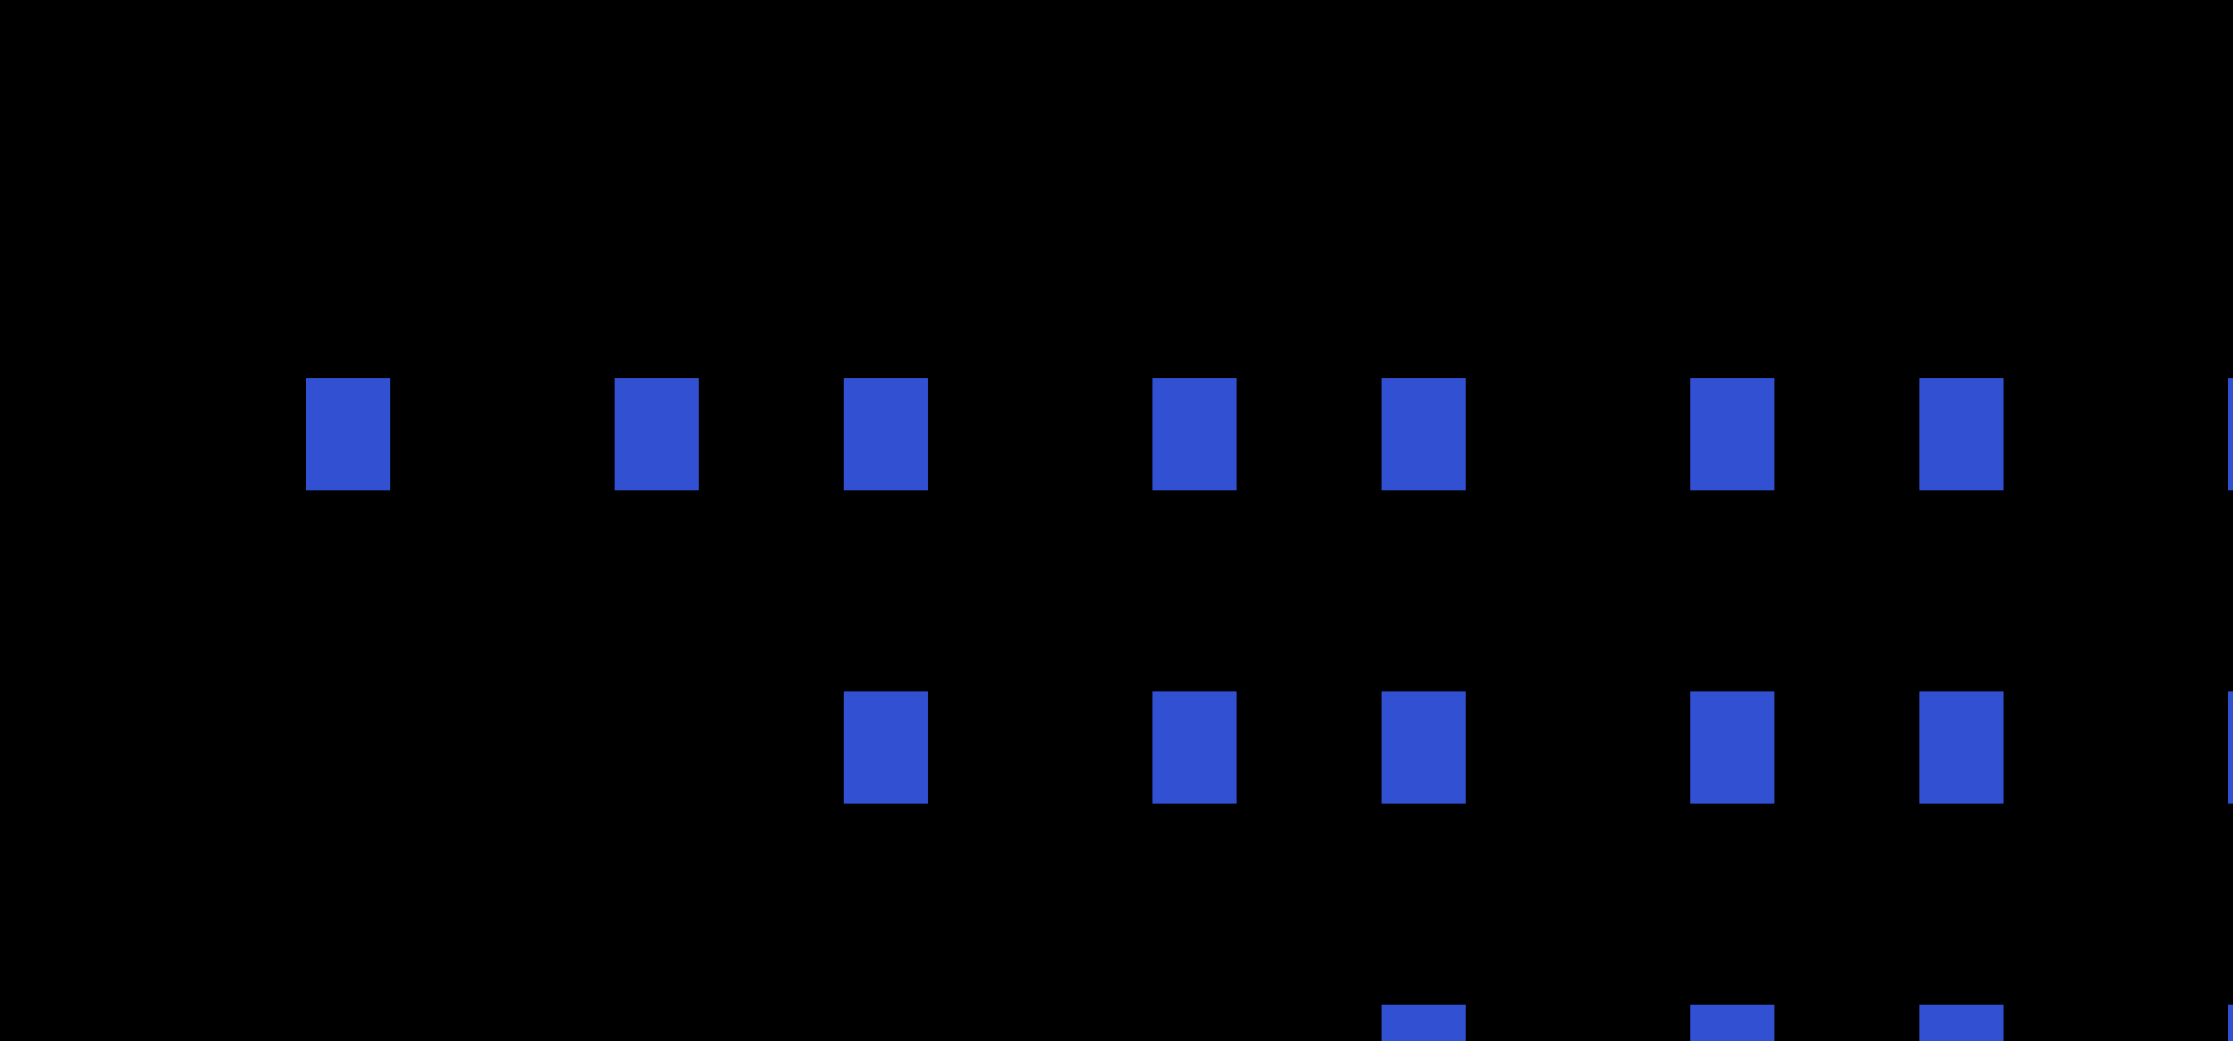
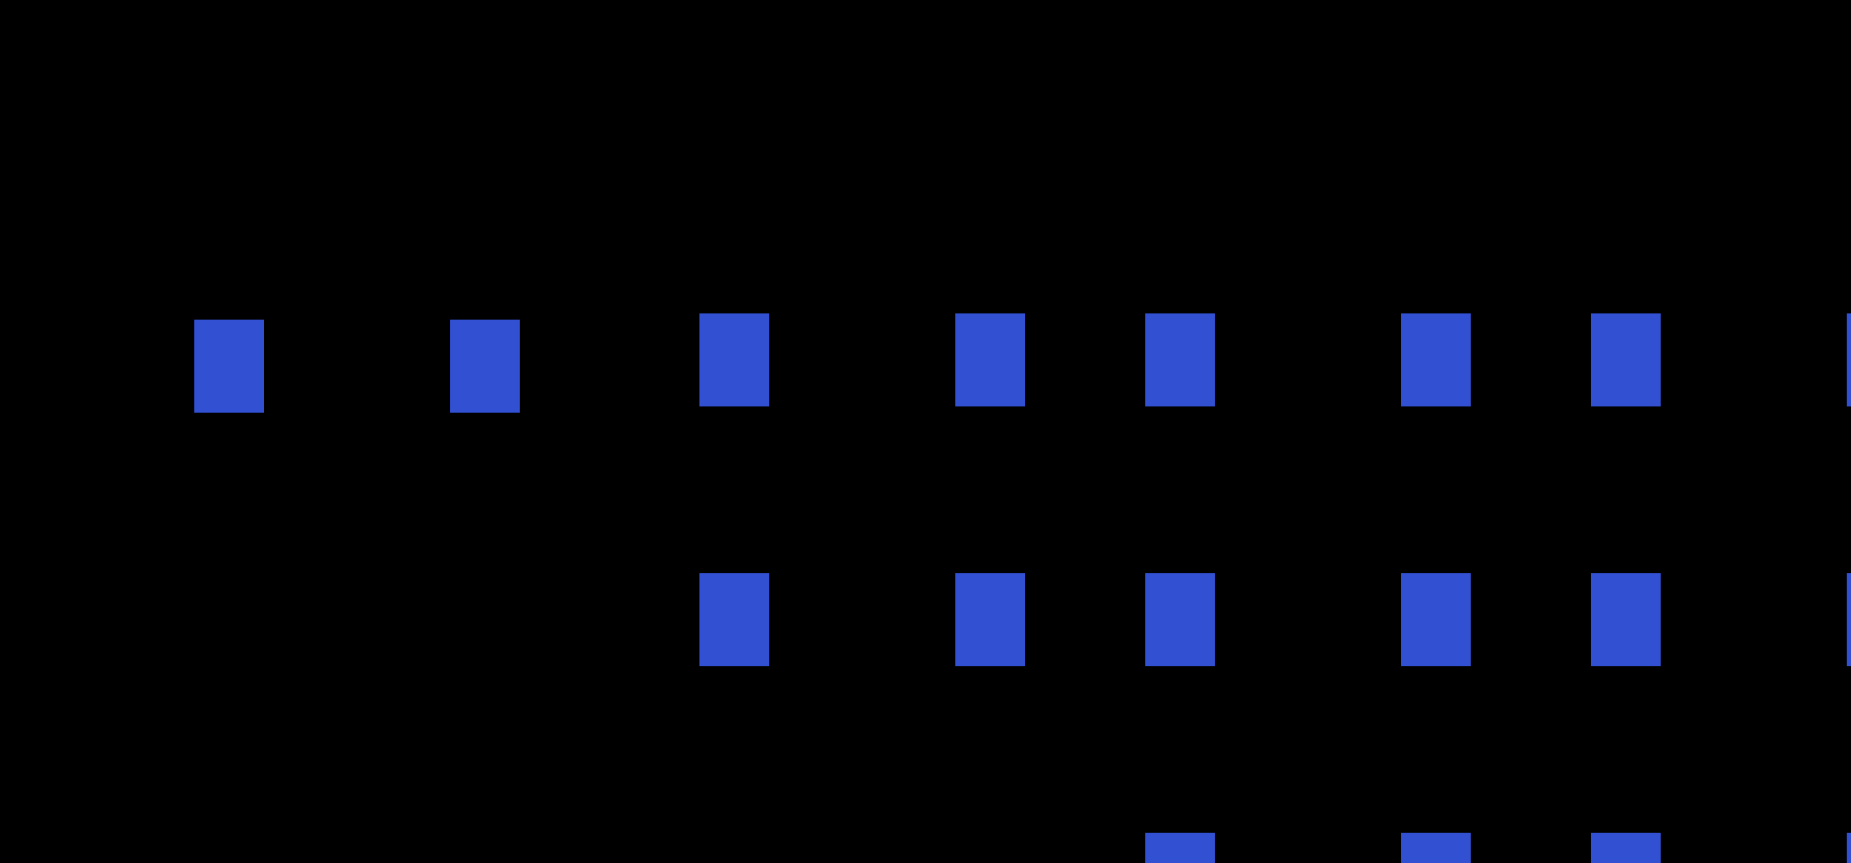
part position: (502, 434) -> (357, 366)

